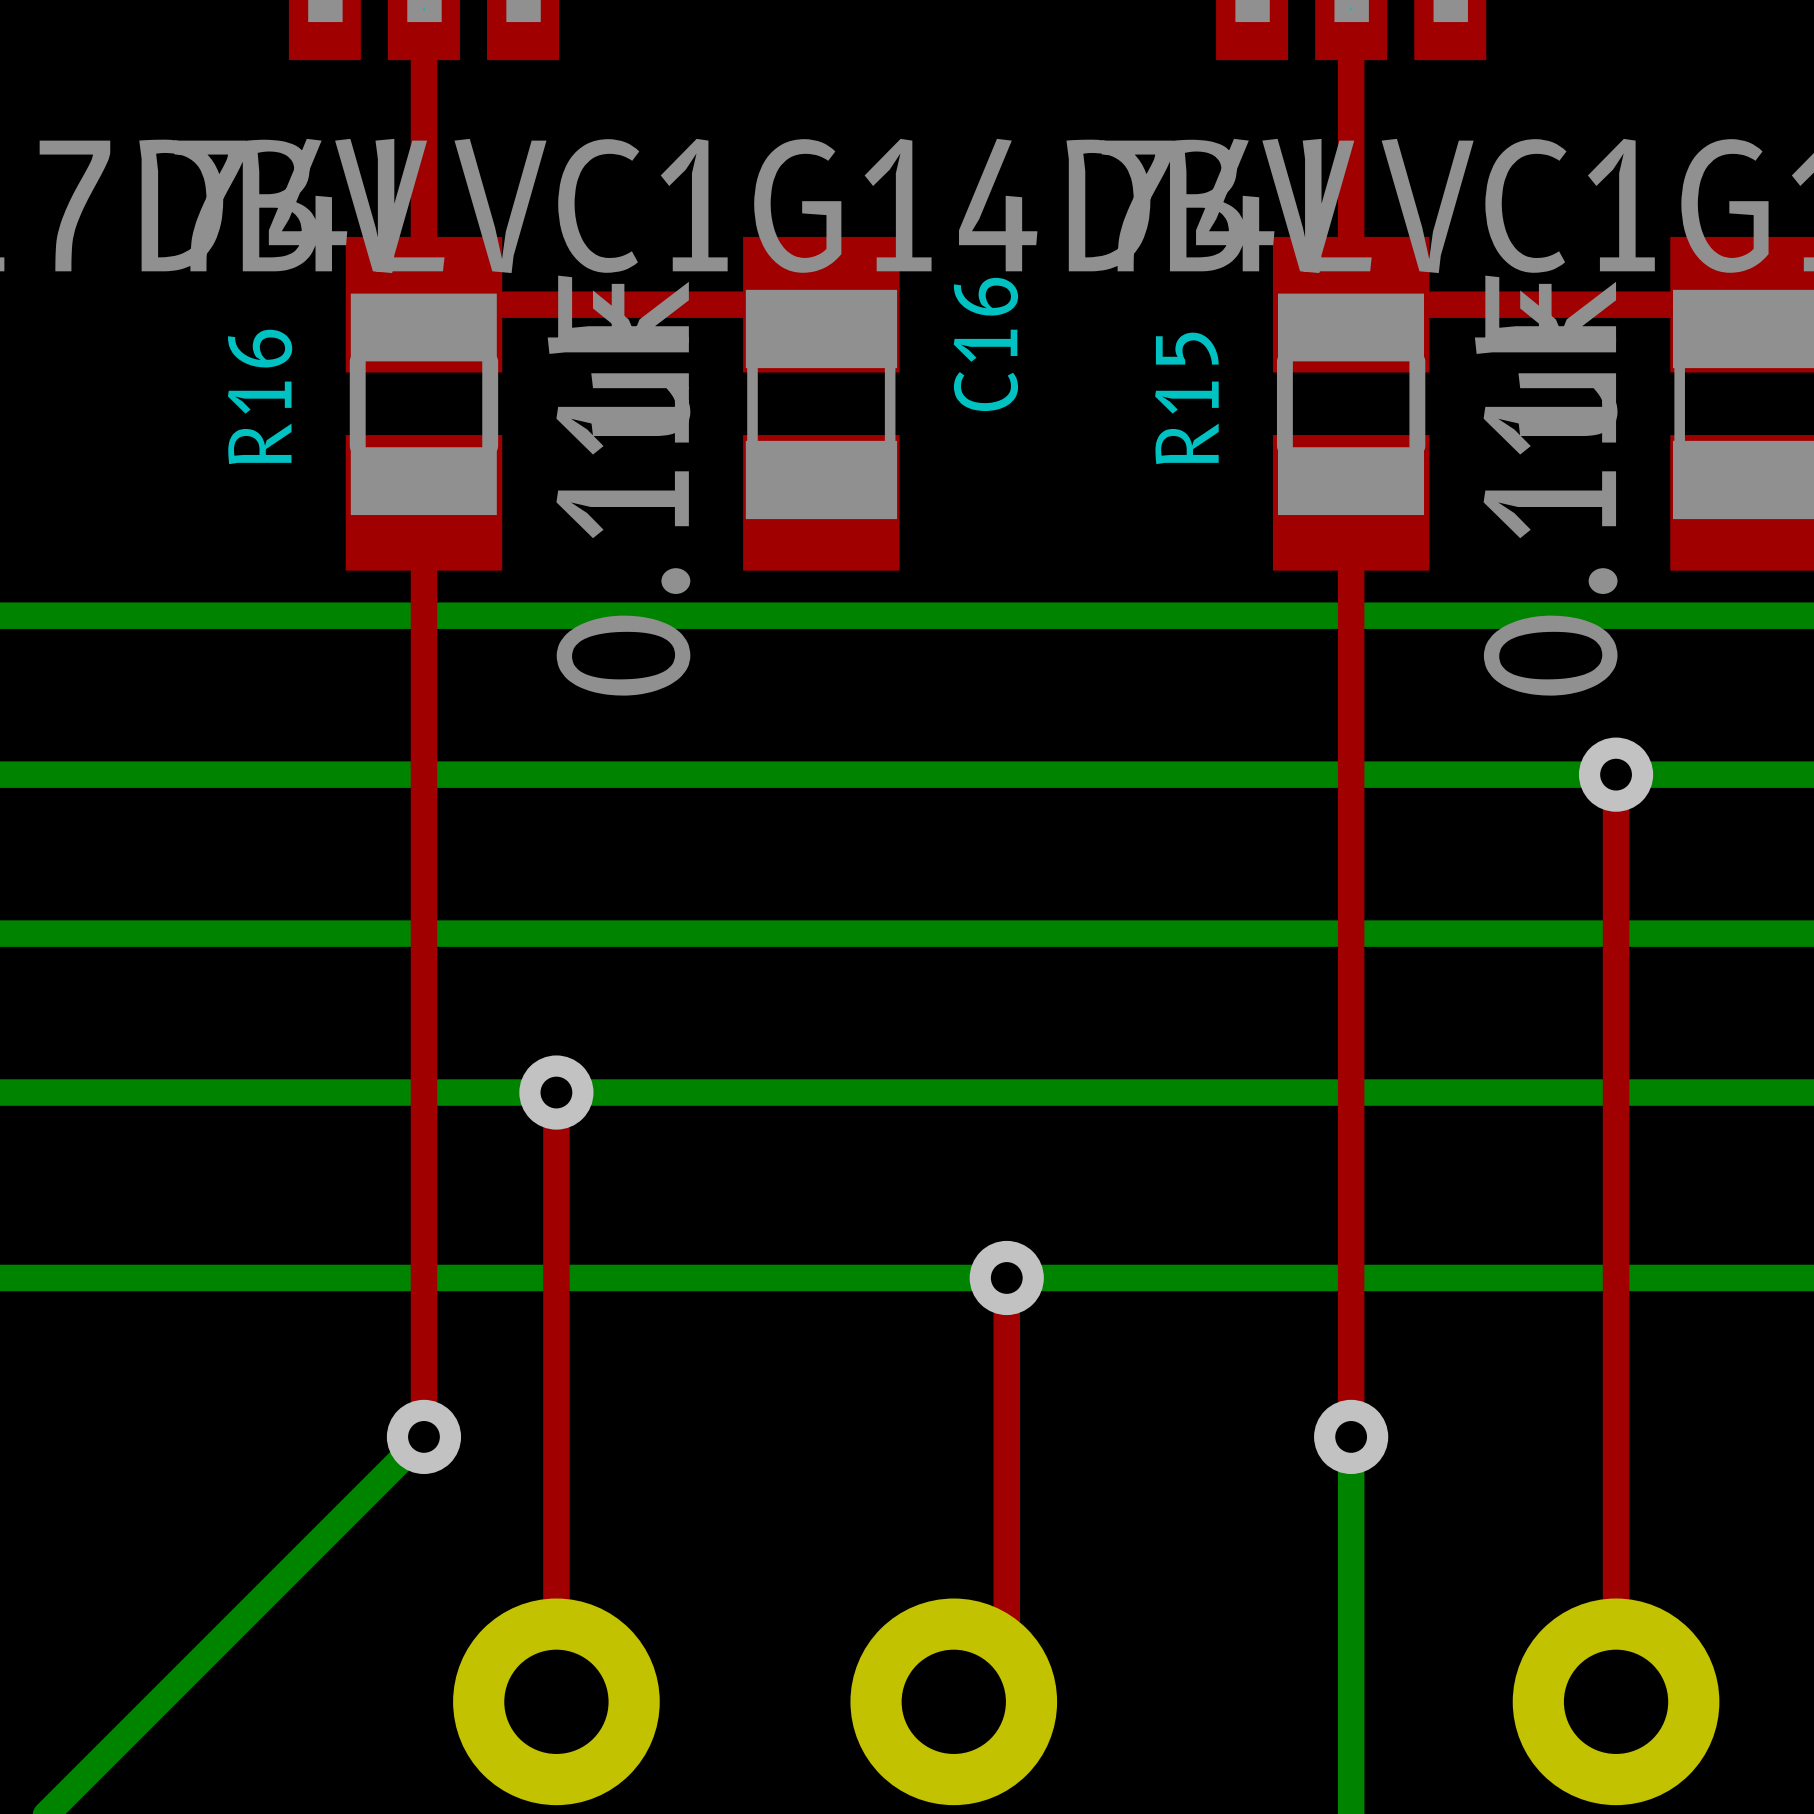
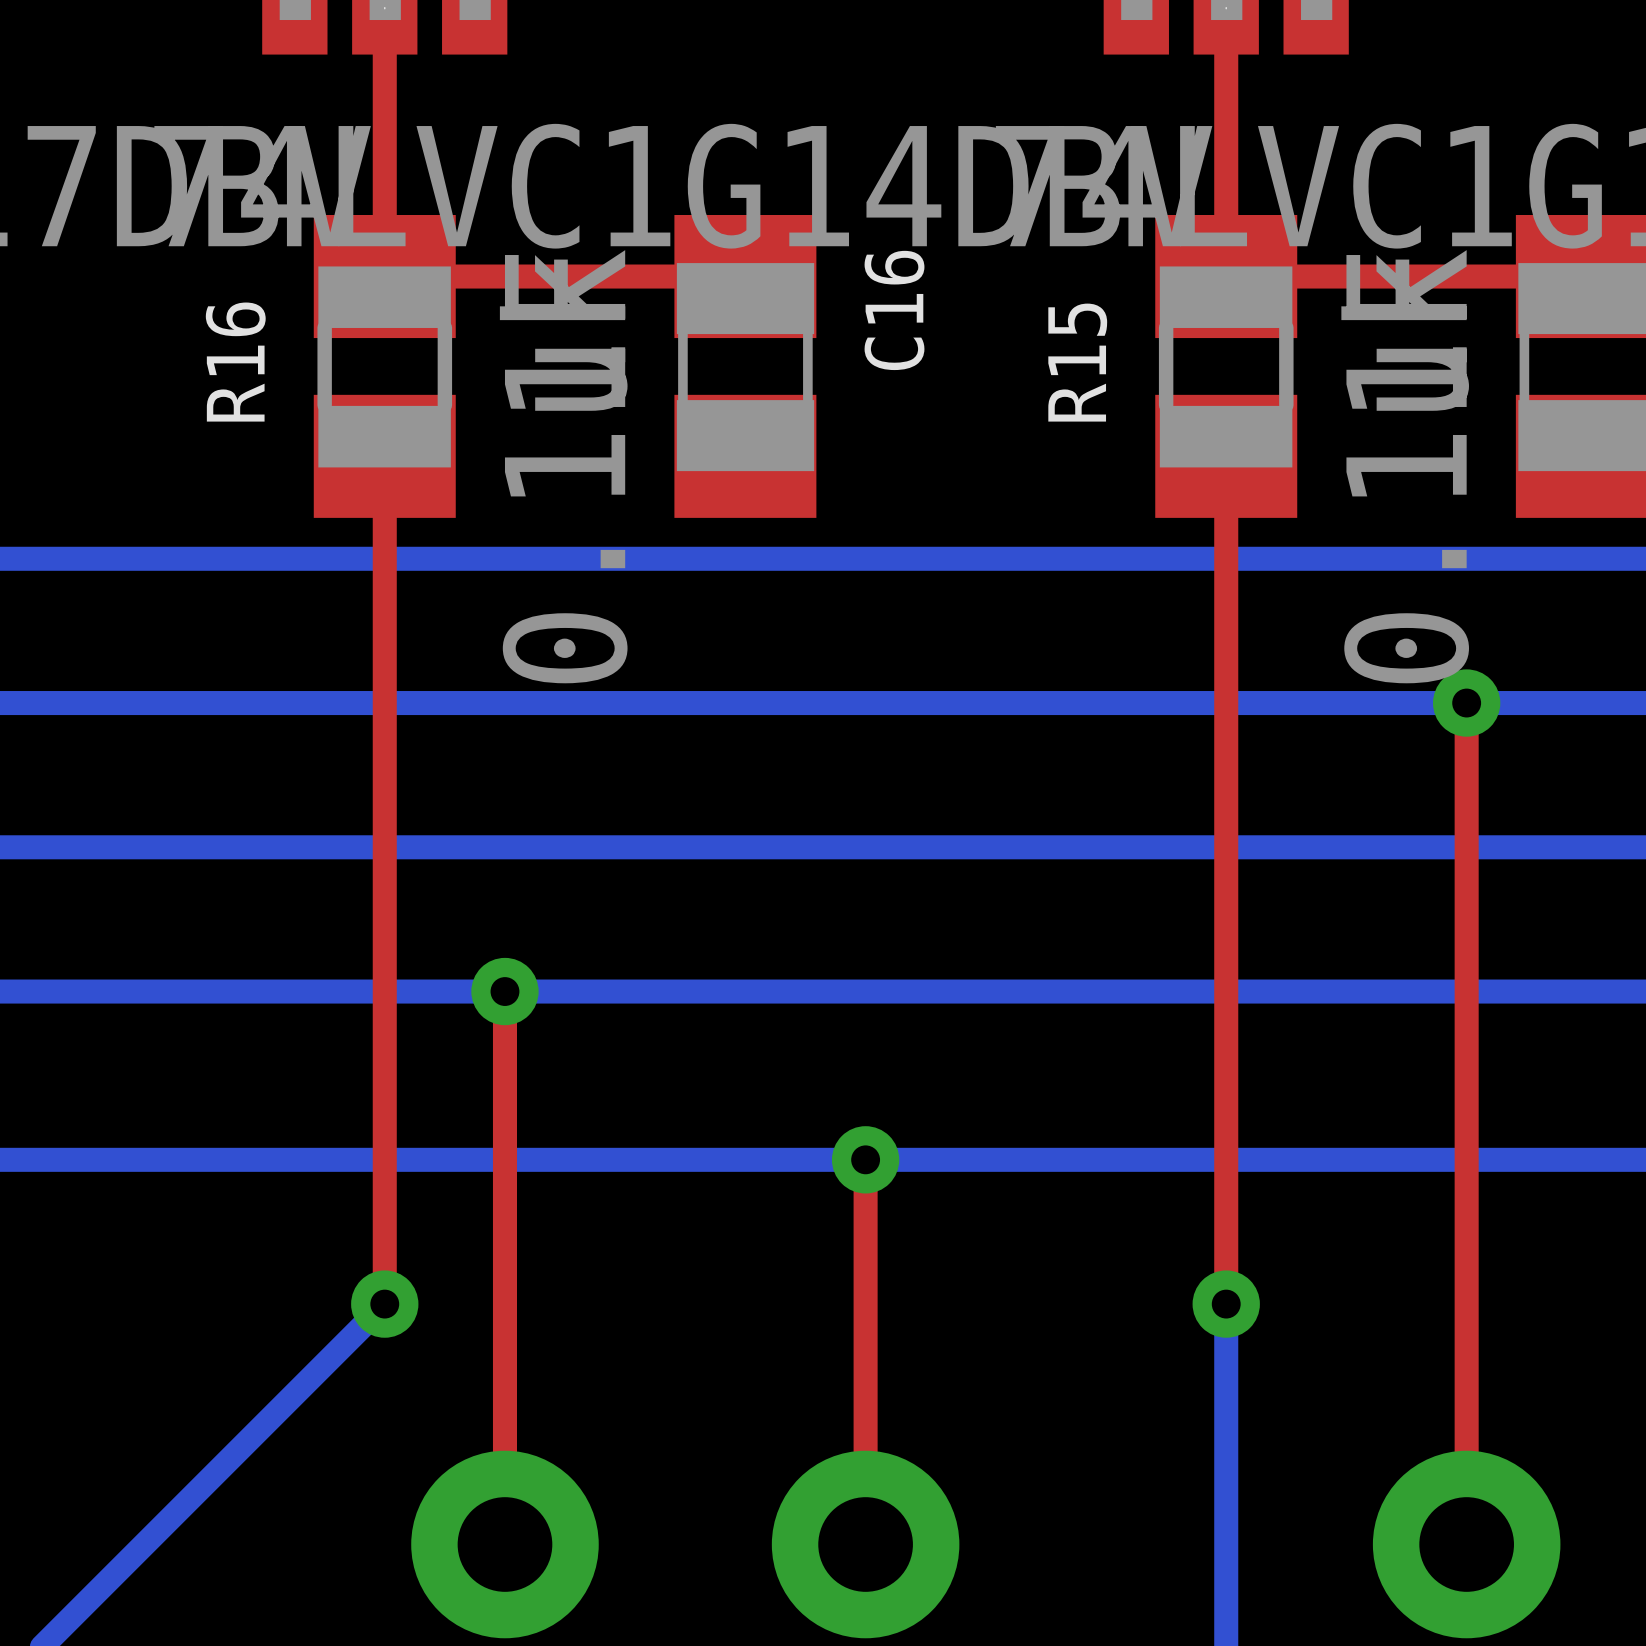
top track: (1006, 1277) (1006, 1648) (953, 1701) -> (865, 1159) (865, 1544)
via position: (1006, 1277) -> (865, 1159)

